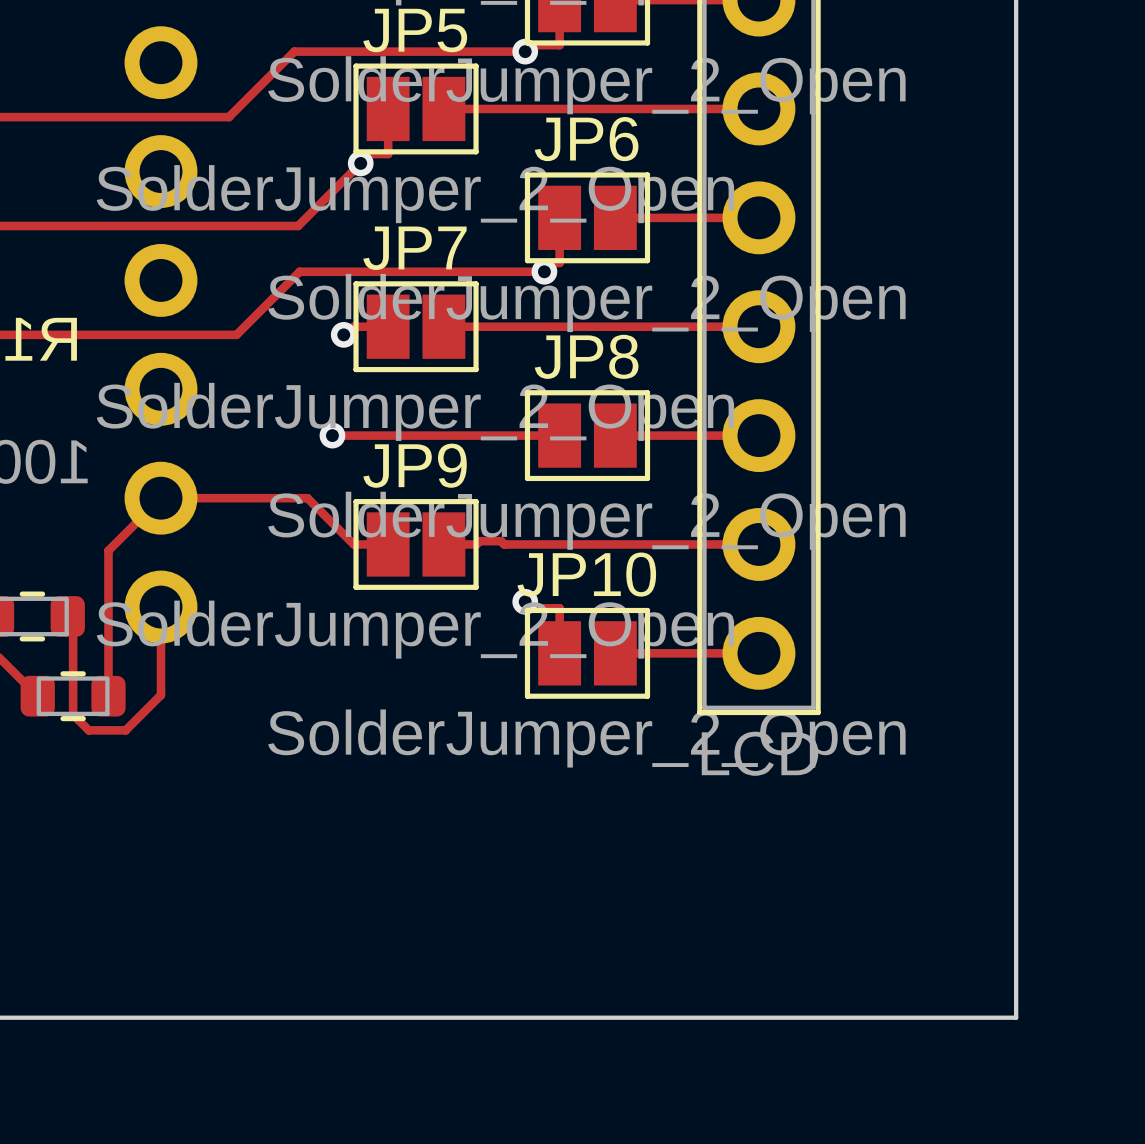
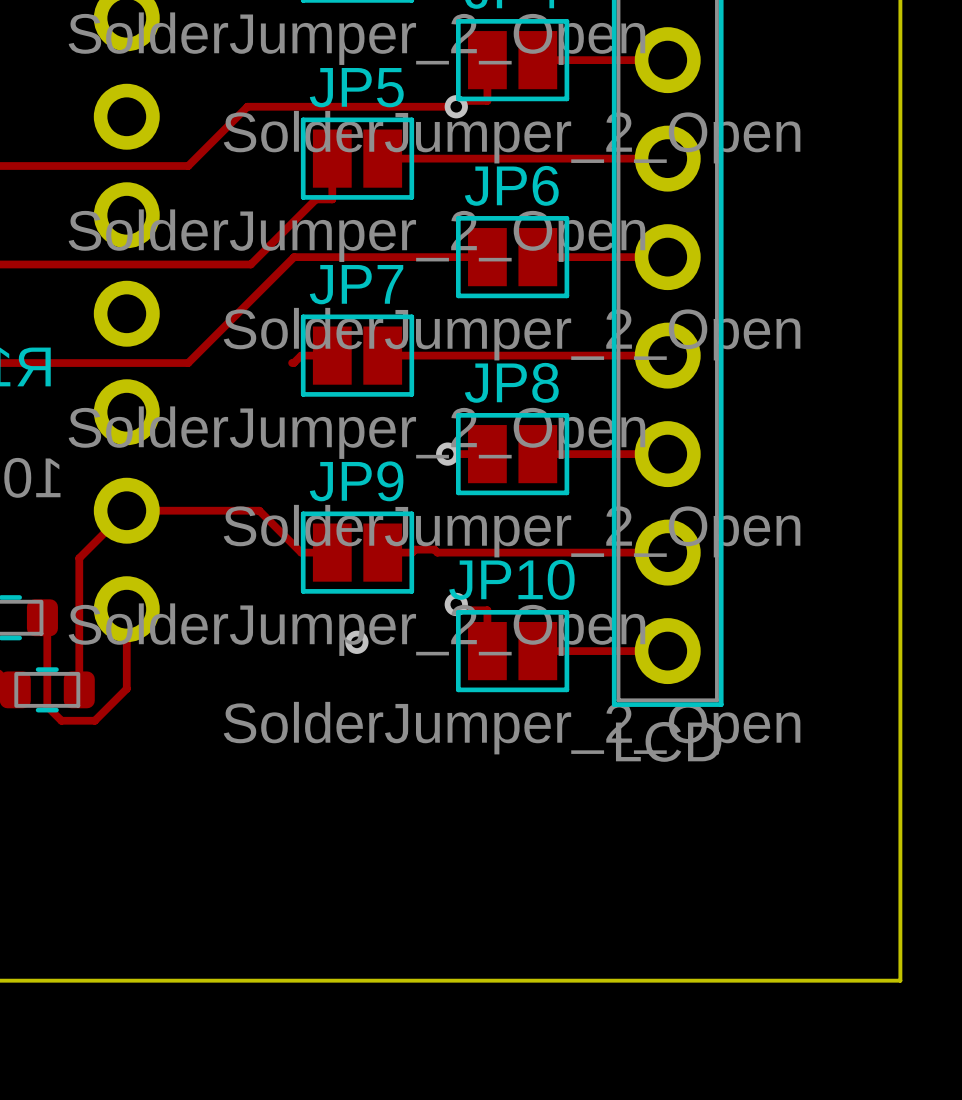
via: (360, 163) -> none
track: (559, 217) (559, 262) (553, 262) (544, 271) (299, 271) (236, 334) (228, 334) -> (487, 257) (294, 257) (188, 363)
via: (544, 271) -> none
via: (343, 334) -> none
track: (332, 435) (515, 435) -> none
via: (332, 435) -> none
via: none -> (447, 454)
via: none -> (356, 642)

